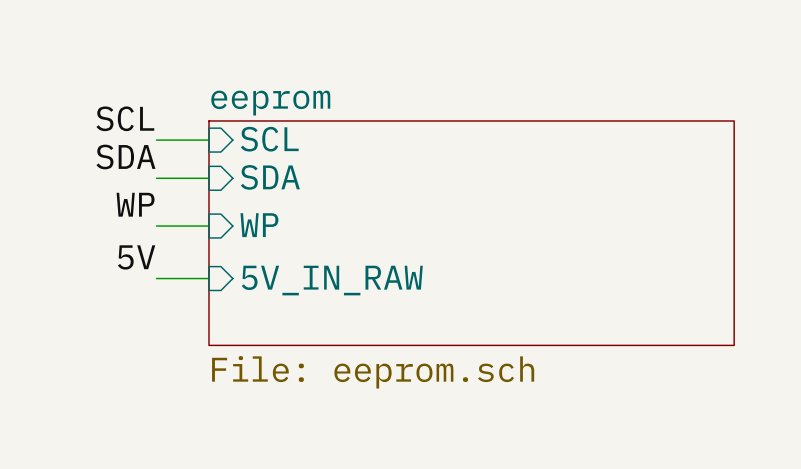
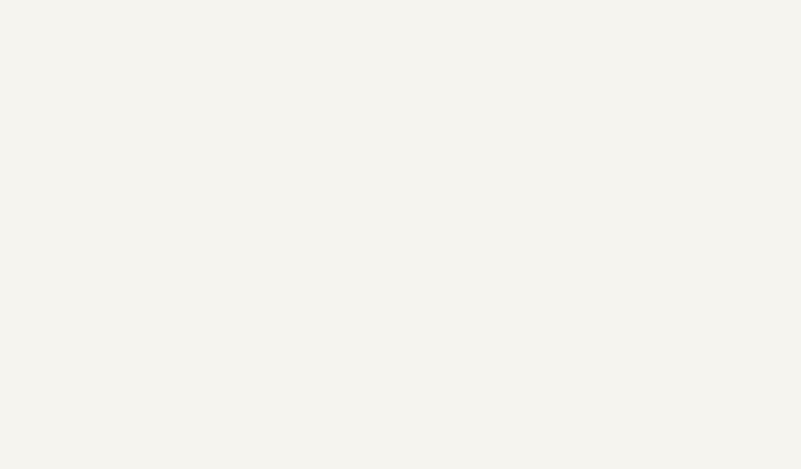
label: SCL (125, 118) -> none
sheet pin: SCL (269, 139) -> none
wire: (156, 140) (208, 140) -> none
label: SDA (125, 156) -> none
sheet pin: SDA (270, 177) -> none
wire: (156, 178) (208, 178) -> none
label: WP (135, 204) -> none
sheet pin: WP (259, 225) -> none
wire: (156, 226) (208, 226) -> none
sheet eeprom: File: eeprom.sch (471, 233) -> none
label: 5V (136, 257) -> none
wire: (156, 278) (208, 278) -> none
sheet pin: 5V_IN_RAW (332, 280) -> none

